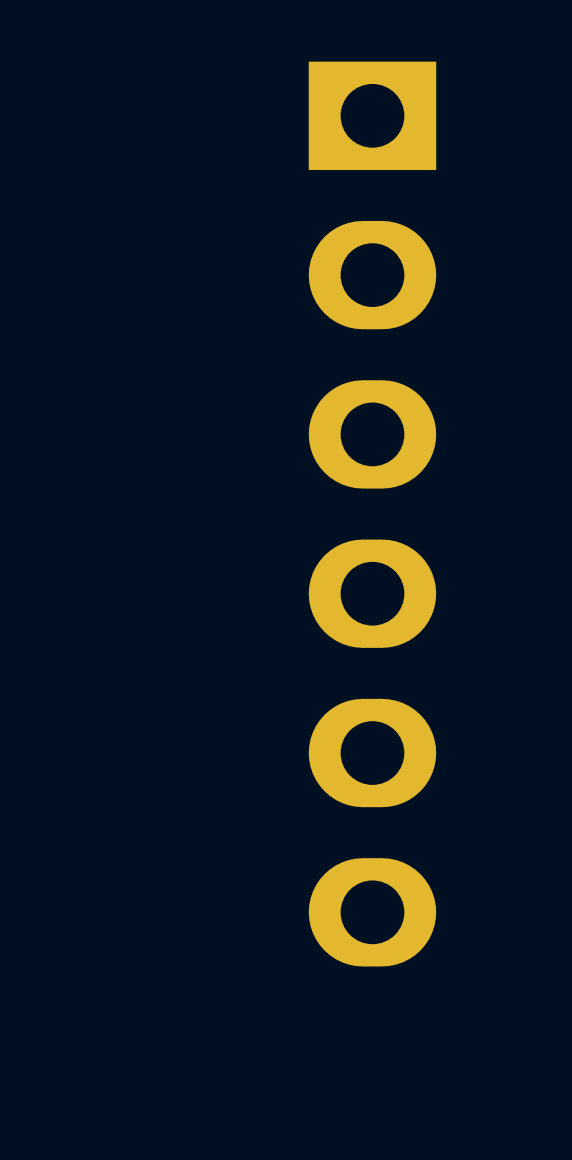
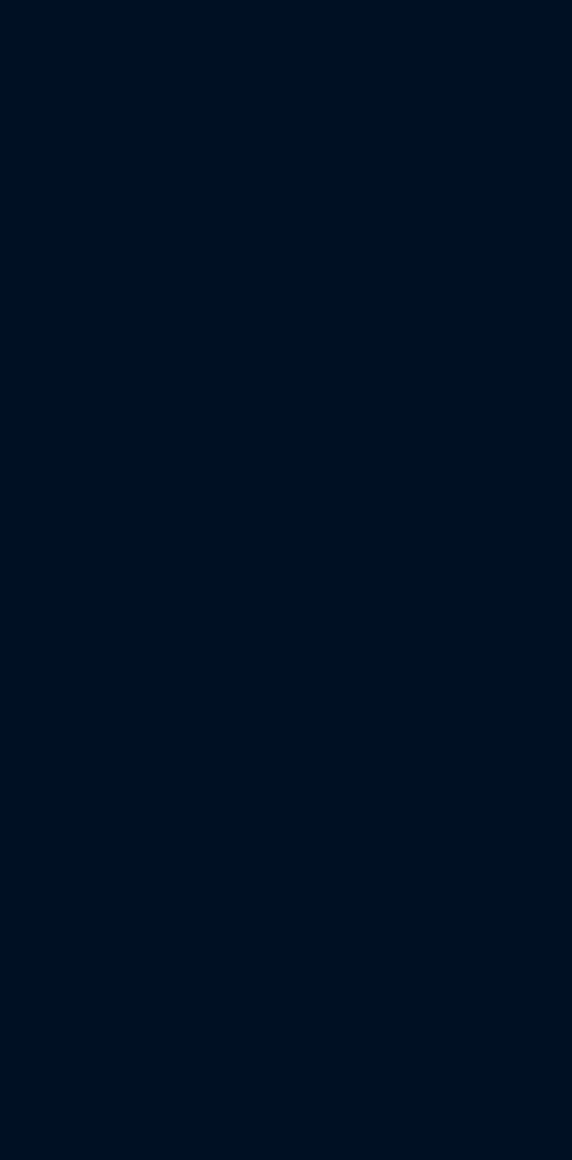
part: (372, 514) -> none

